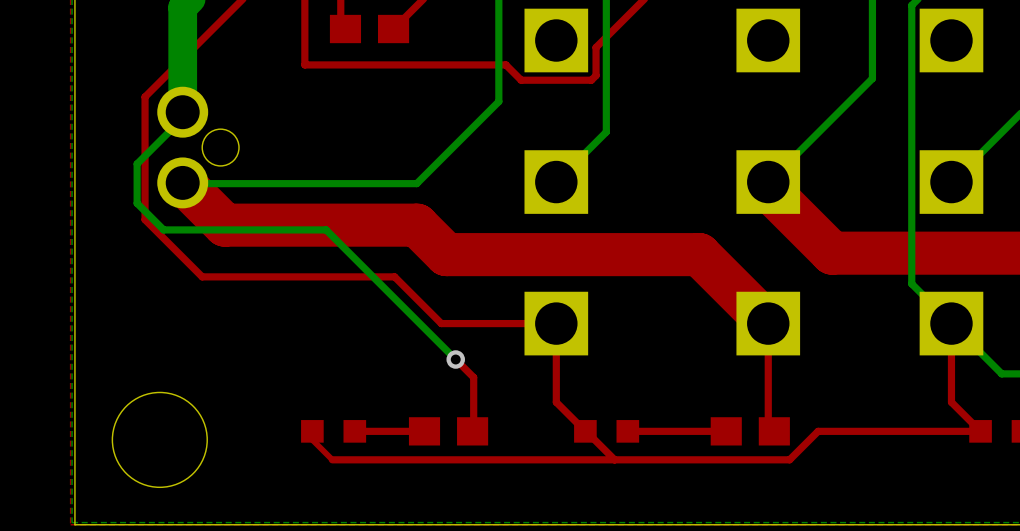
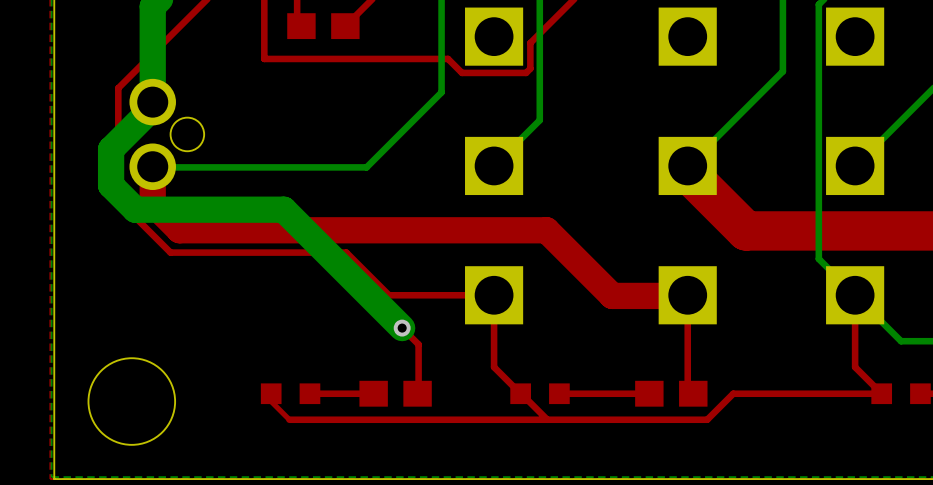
bottom track width: thin (182, 118) (137, 163) (137, 203) (163, 229) (326, 229) (455, 359) -> thick (152, 107) (111, 149) (111, 185) (135, 209) (283, 209) (402, 328)
top track: (182, 182) (224, 225) (416, 225) (446, 254) (699, 254) (768, 323) -> (152, 166) (152, 203) (179, 230) (546, 230) (612, 295) (687, 295)

